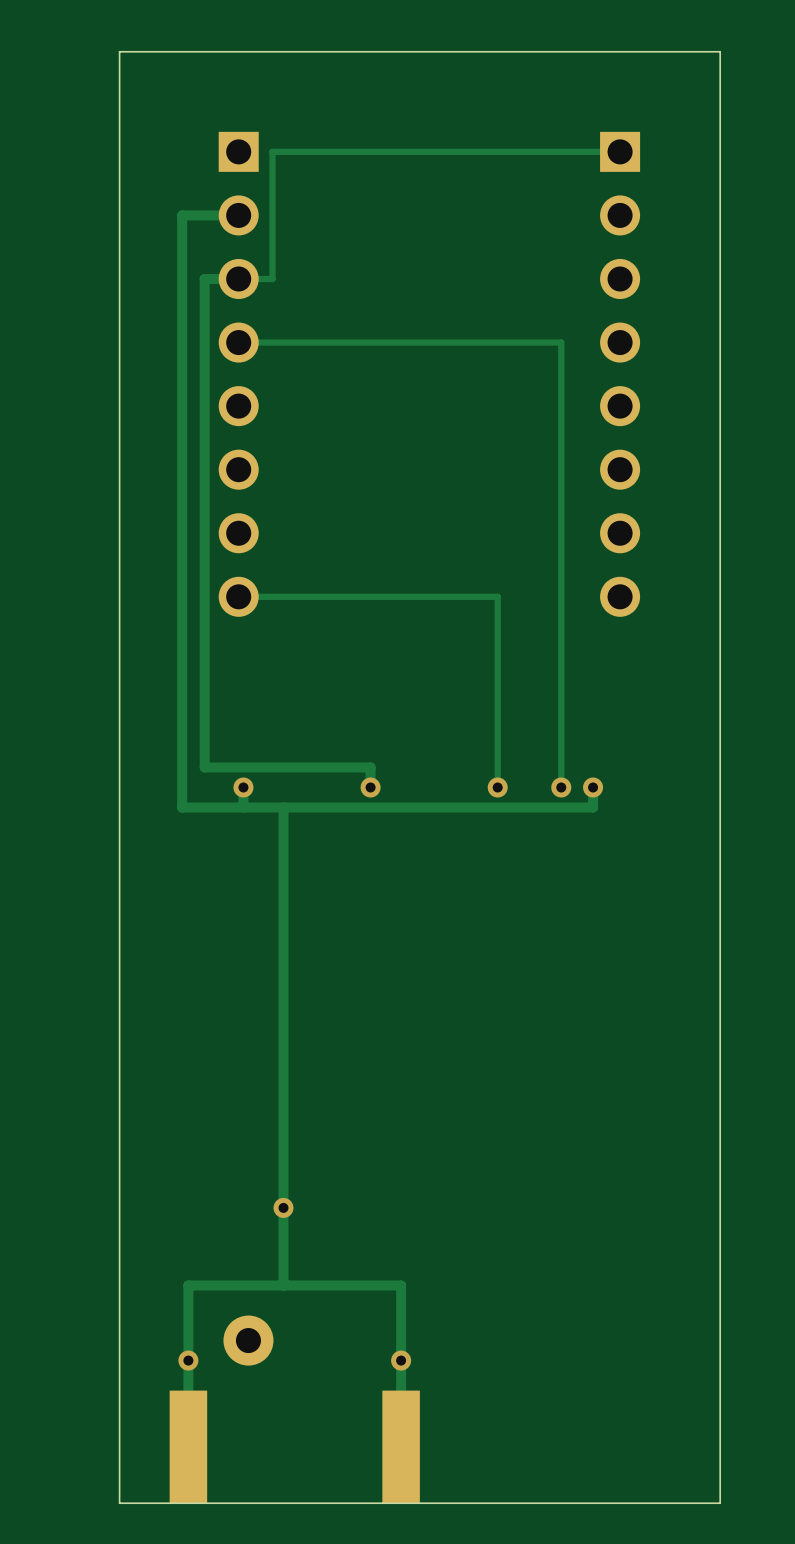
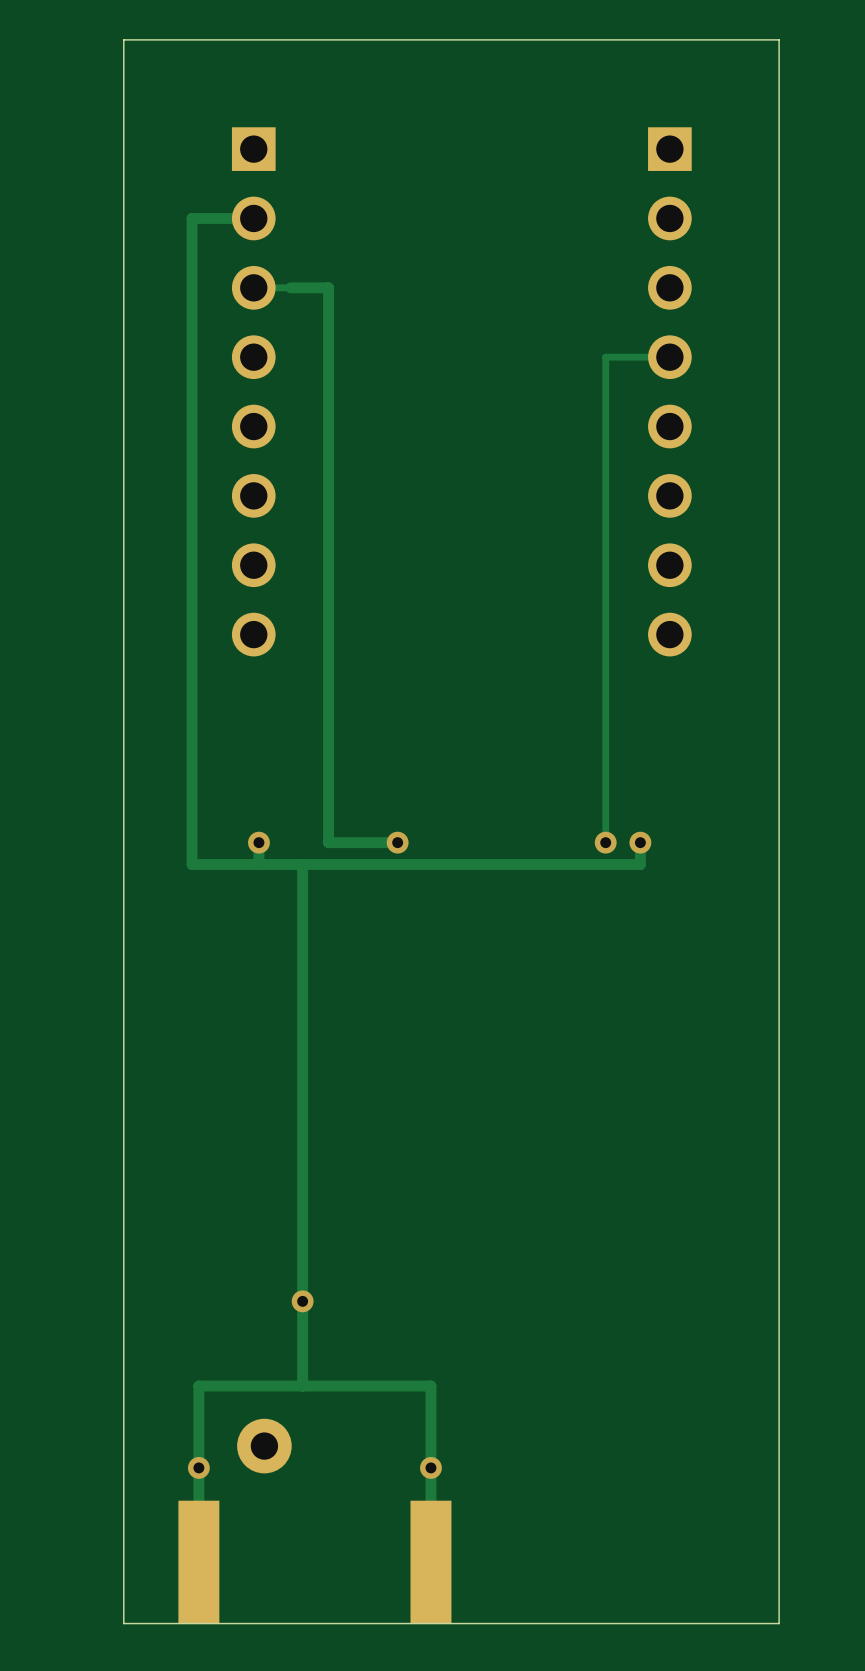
track: (620, 151) (272, 151) (272, 278) -> none
track: (238, 278) (204, 278) (204, 767) (370, 767) (370, 787) -> (290, 287) (328, 287) (328, 842) (397, 842)
track: (561, 342) (238, 342) -> (605, 357) (669, 357)
track: (238, 596) (497, 596) (497, 787) -> none
via: (497, 787) -> none

